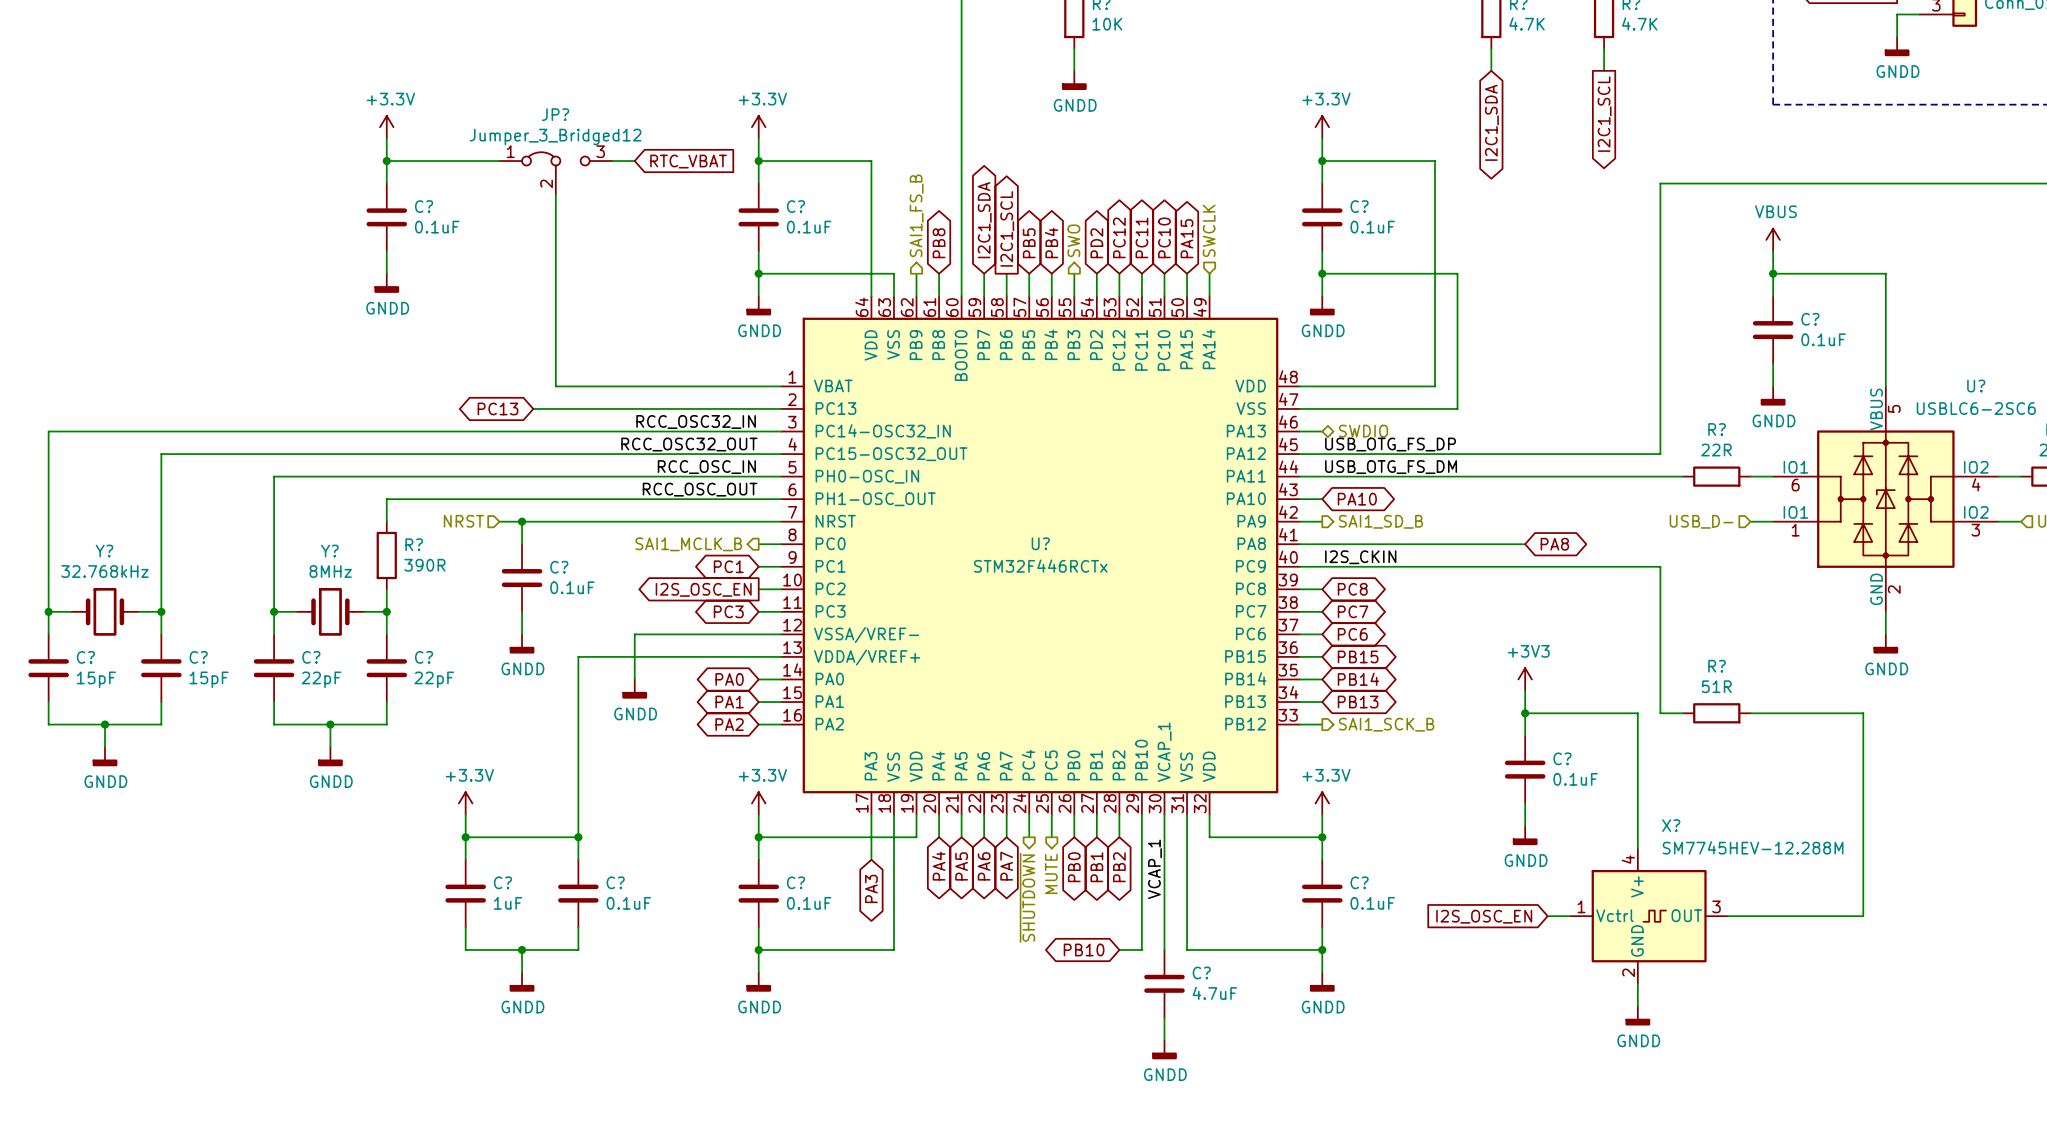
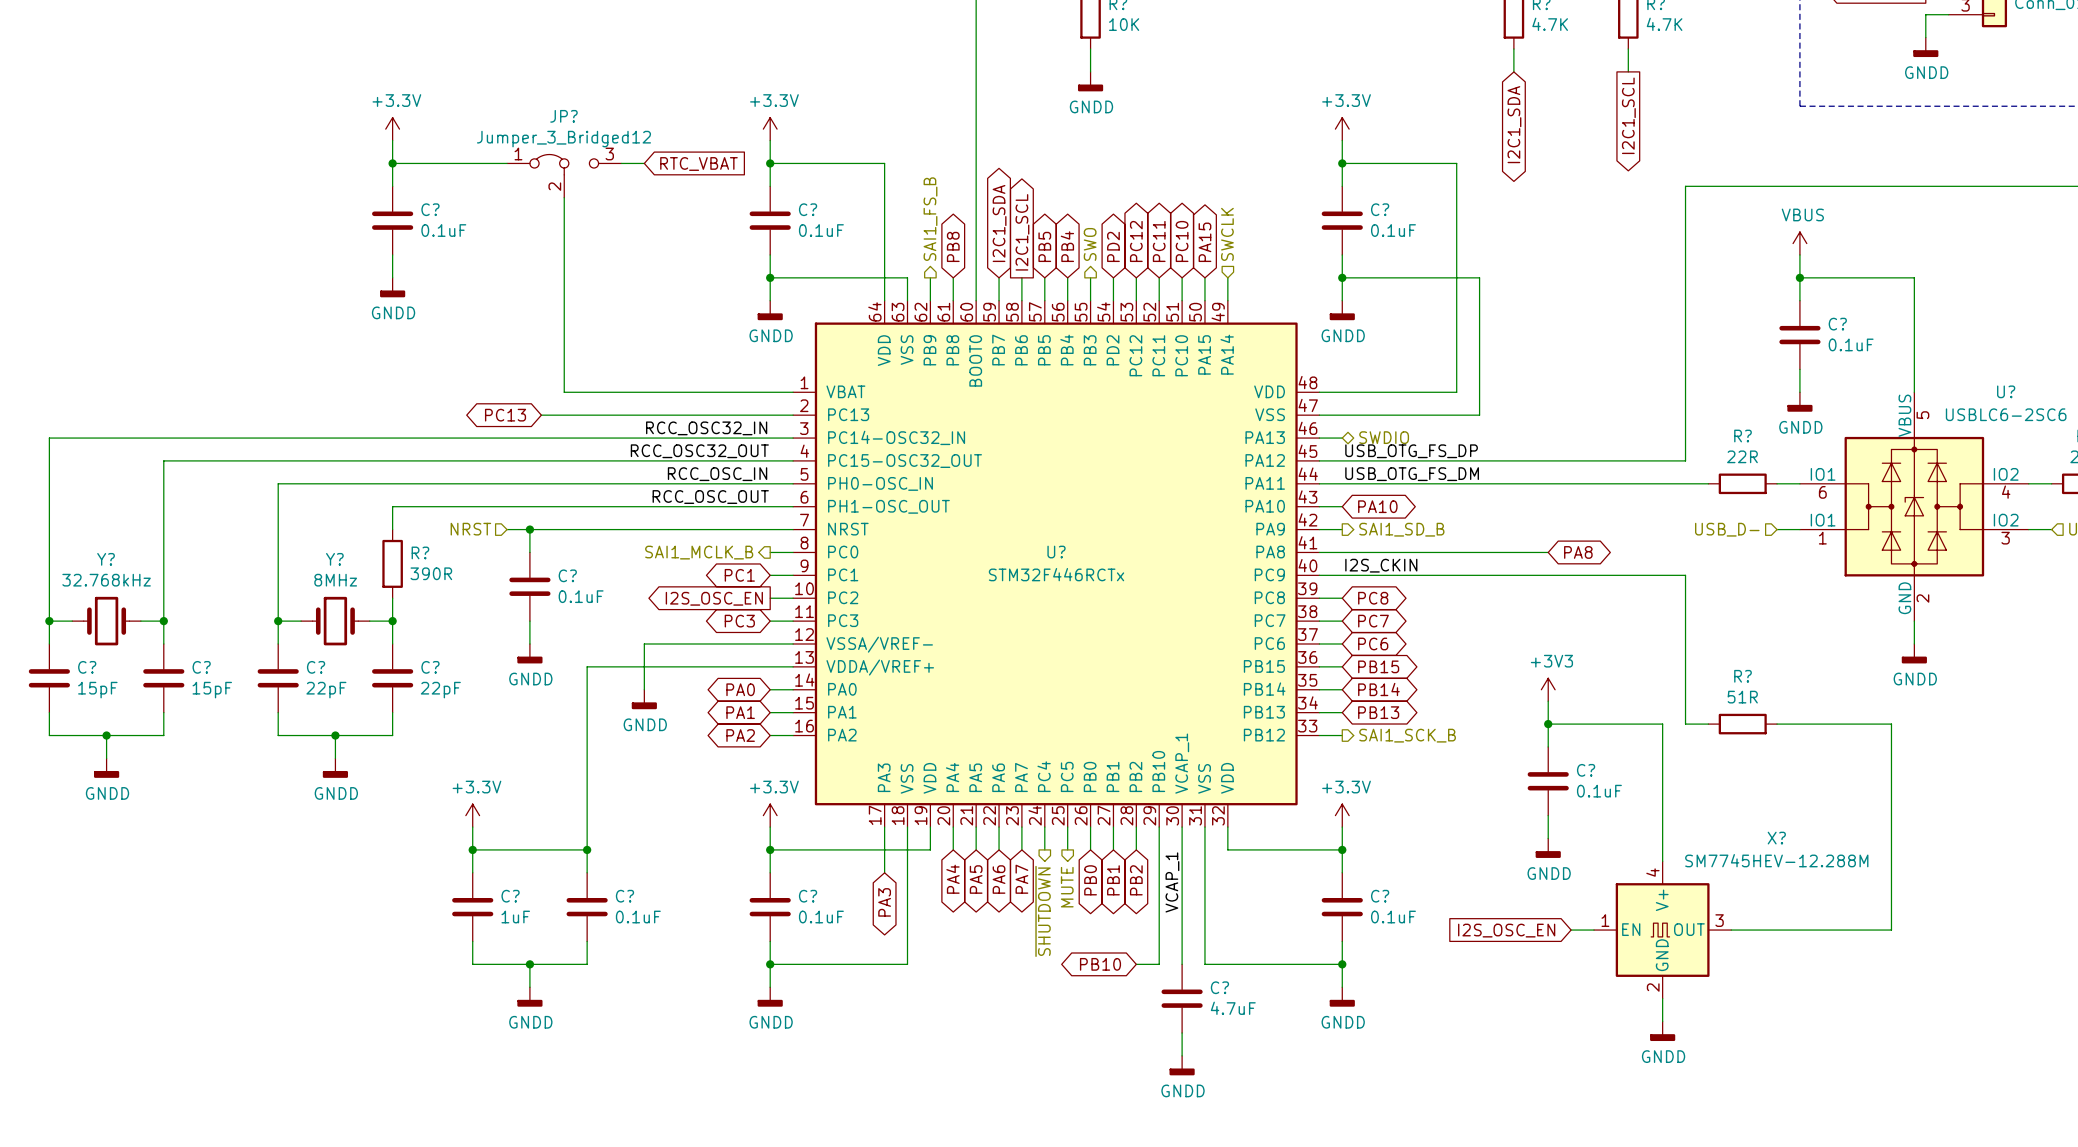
X?: none -> SM7745HEV-12.288M (1662, 930)
X?: SM7745HEV-12.288M (1649, 916) -> none

